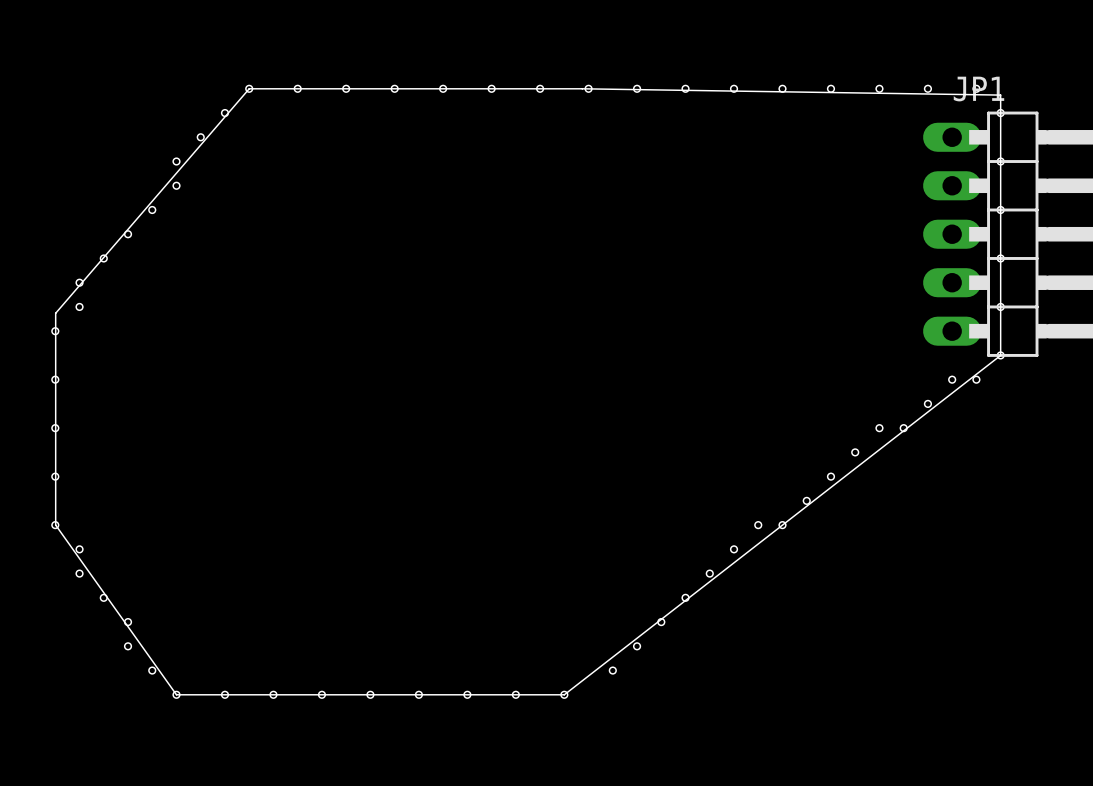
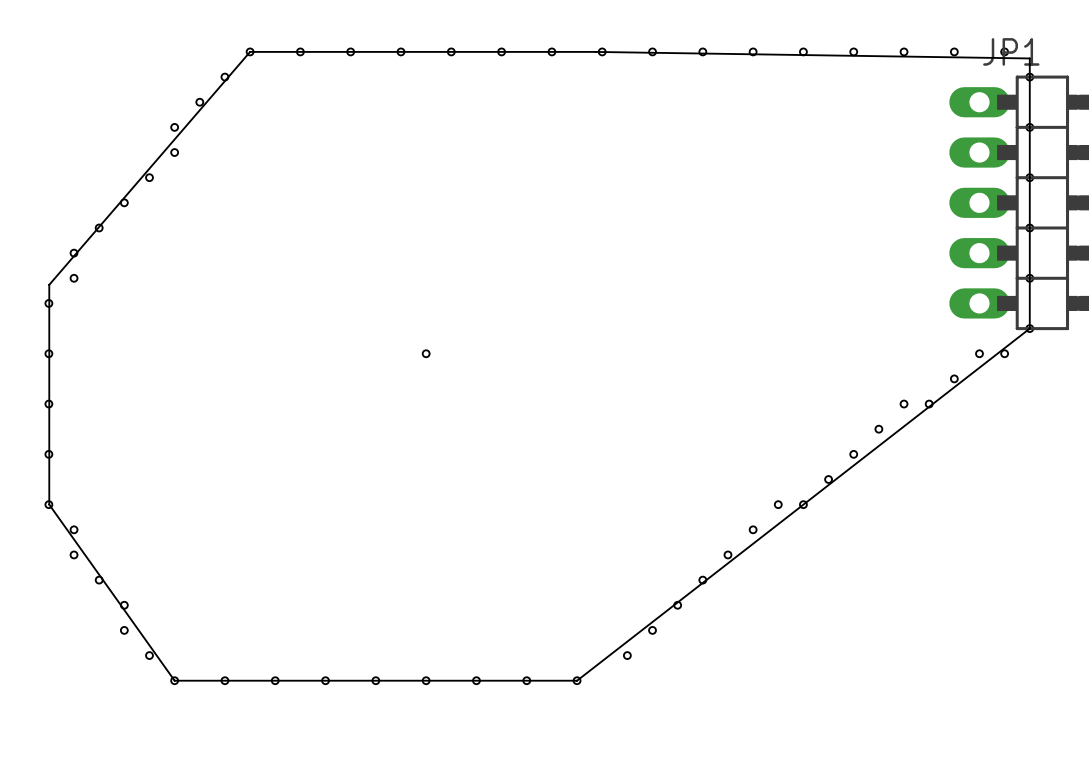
hole: none -> (426, 353)

